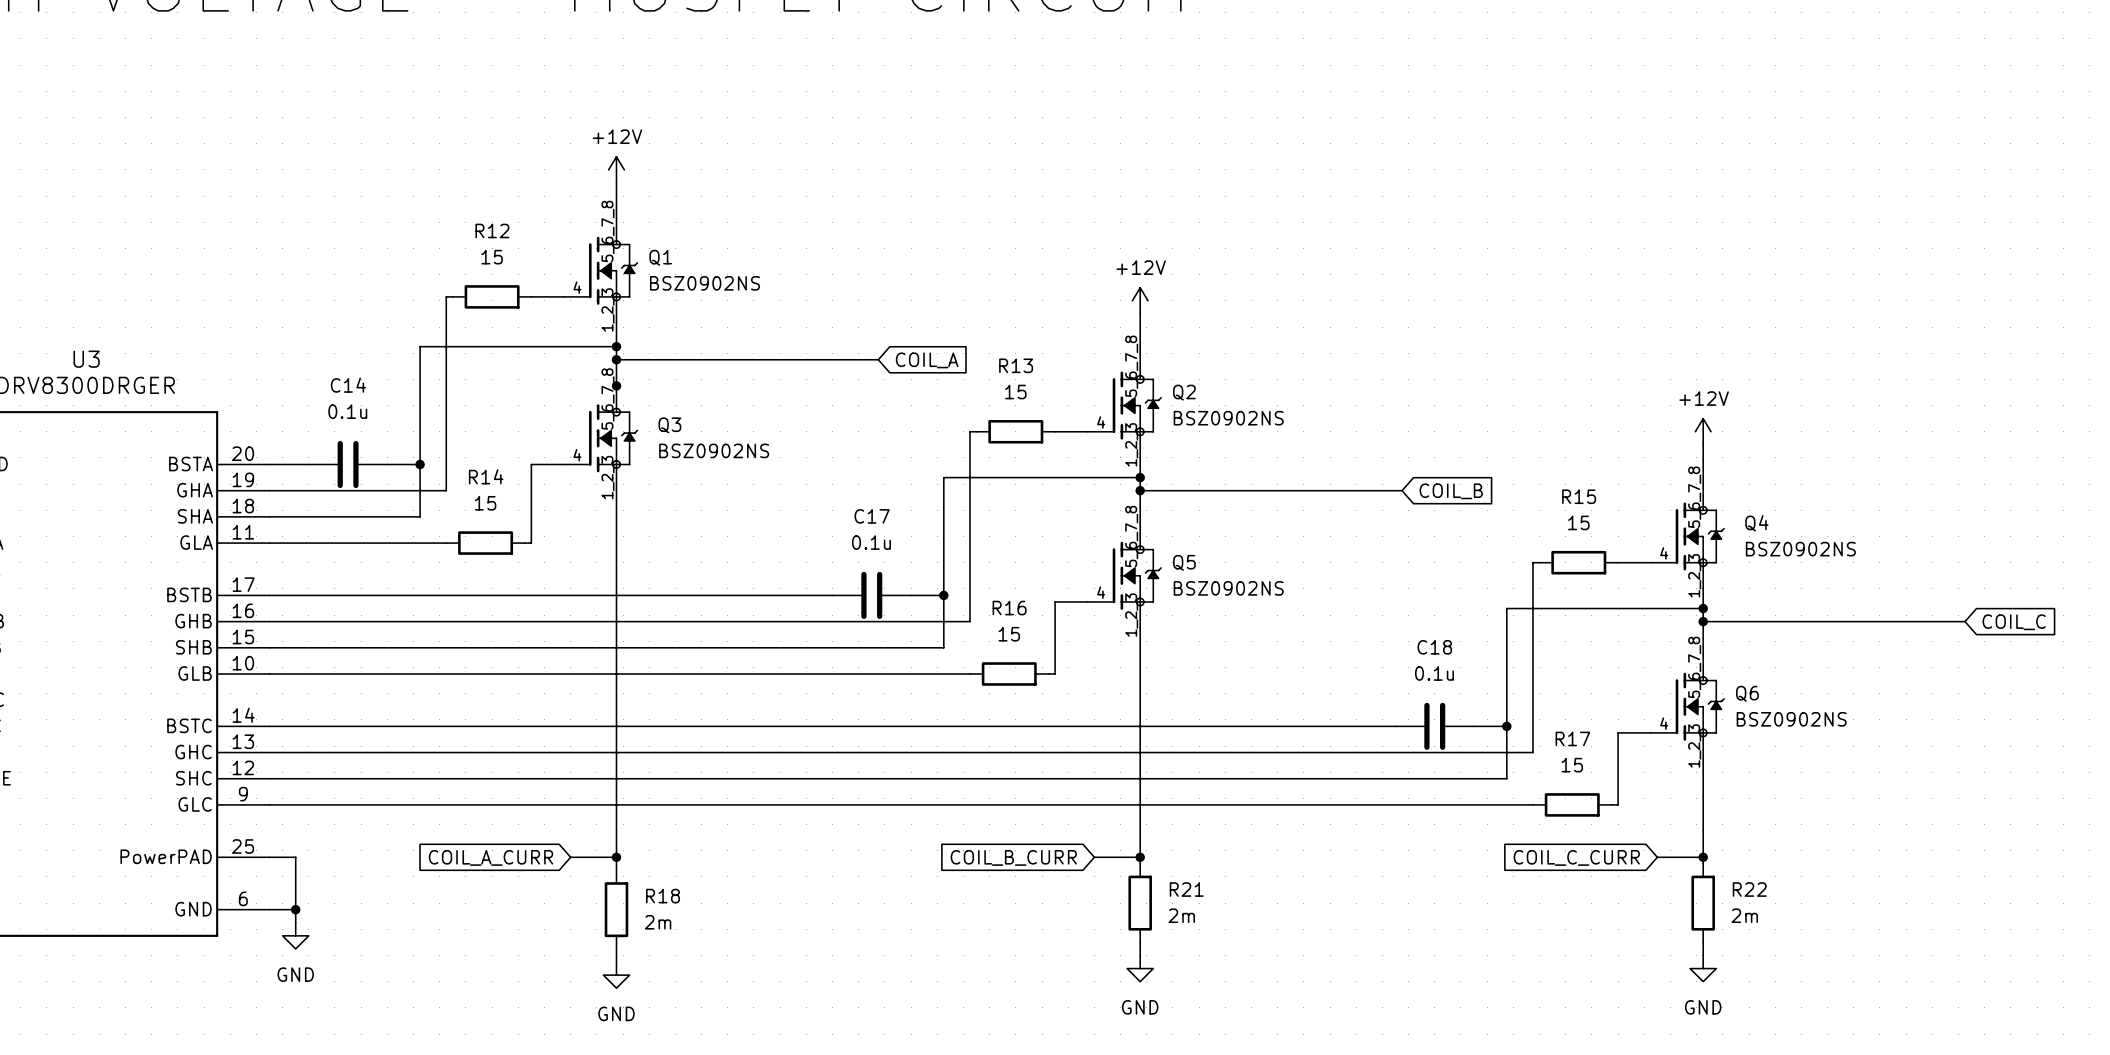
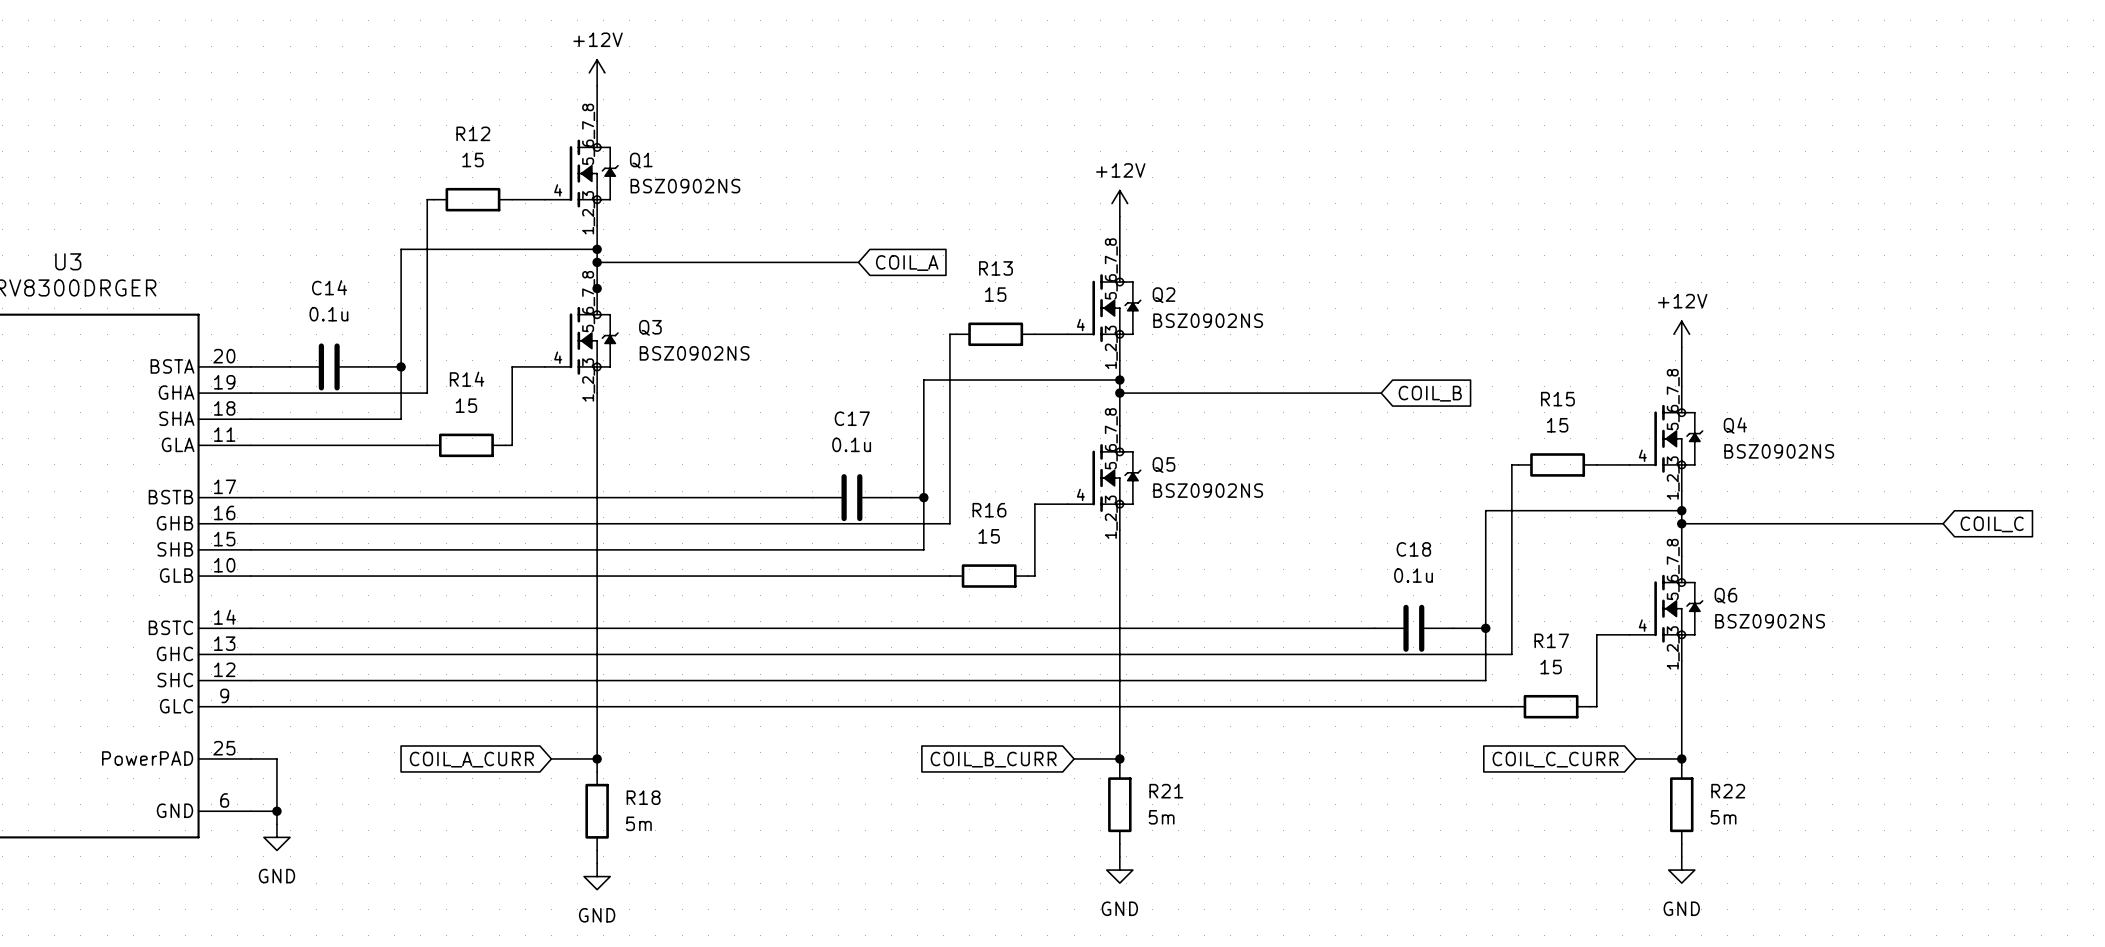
R21 value: 2m (1181, 915) -> 5m (1161, 817)
R22 value: 2m (1744, 915) -> 5m (1723, 817)
R18 value: 2m (658, 922) -> 5m (638, 823)

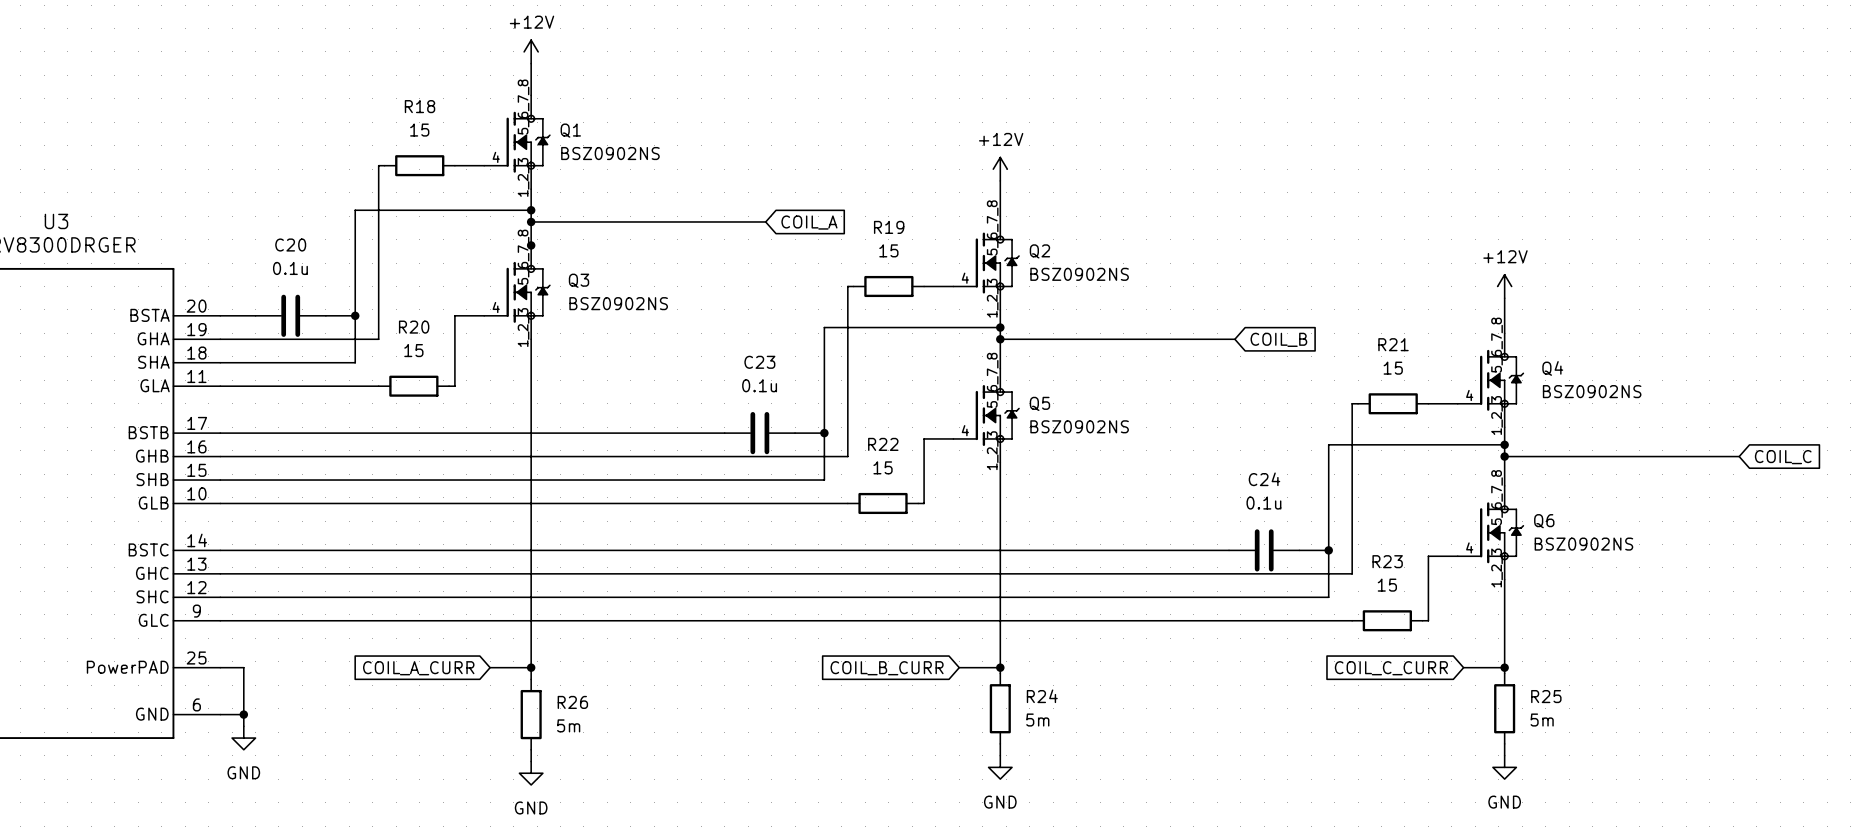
R12 name: R12 (473, 133) -> R18 (420, 106)
R13 name: R13 (996, 268) -> R19 (889, 227)
C14 name: C14 (329, 287) -> C20 (290, 245)
R14 name: R14 (467, 379) -> R20 (414, 327)
R15 name: R15 (1557, 399) -> R21 (1393, 344)
C17 name: C17 (852, 418) -> C23 (759, 362)
R16 name: R16 (989, 510) -> R22 (883, 444)
C18 name: C18 (1413, 549) -> C24 (1264, 479)
R17 name: R17 (1551, 640) -> R23 (1387, 561)
R21 name: R21 (1166, 791) -> R24 (1042, 696)
R22 name: R22 (1728, 791) -> R25 (1546, 696)
R18 name: R18 (643, 797) -> R26 (572, 702)

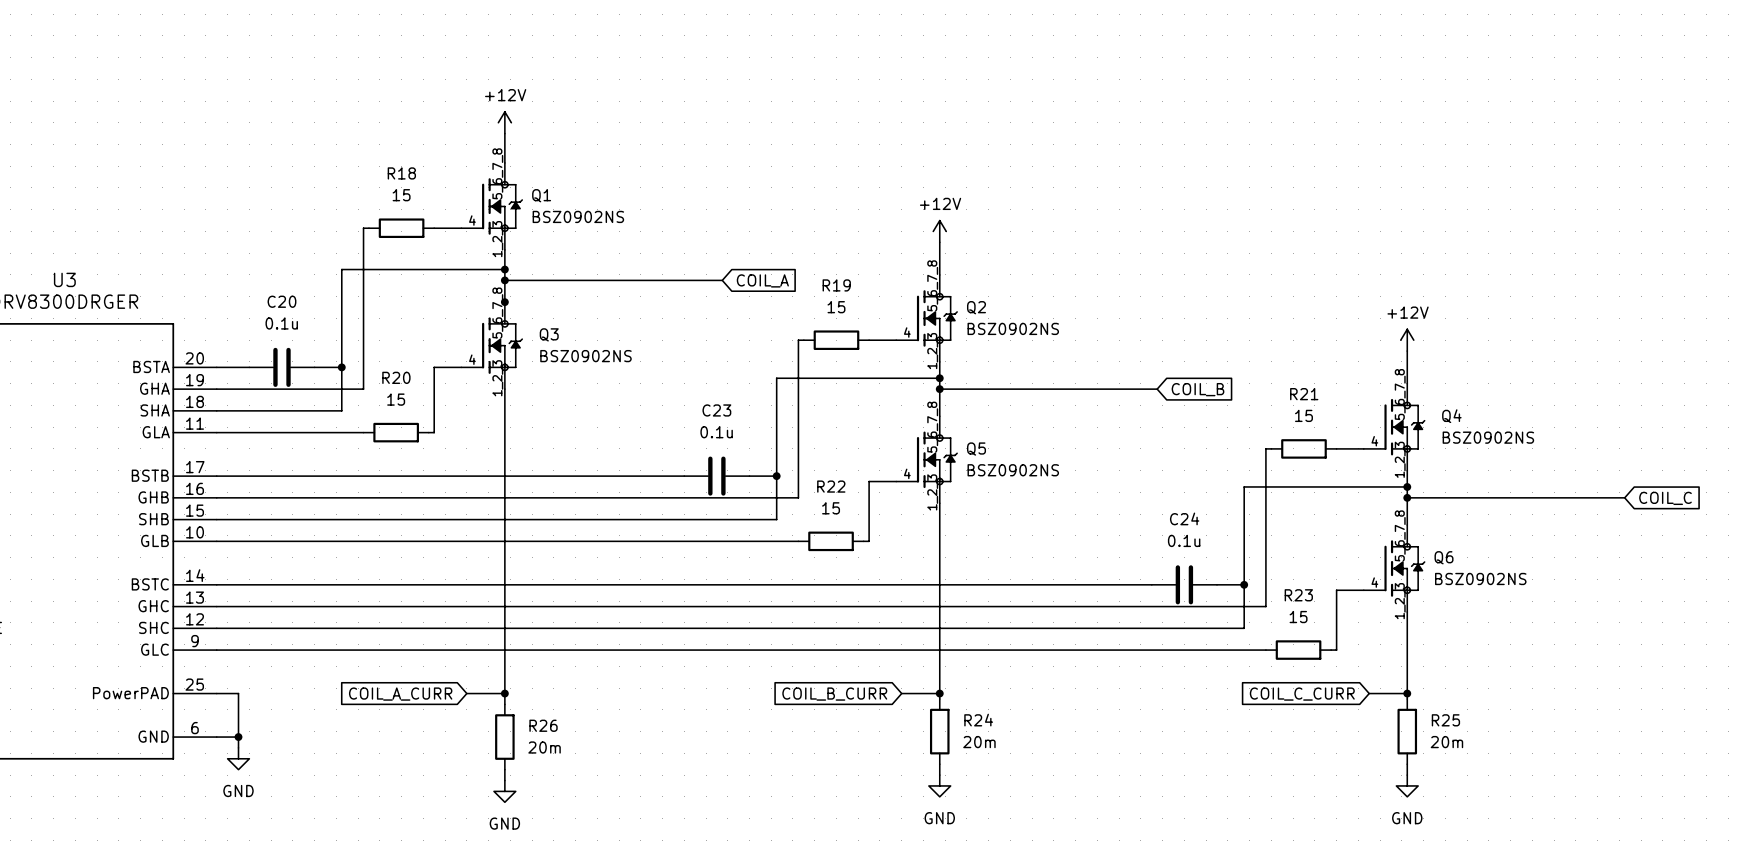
R24 value: 5m (1037, 720) -> 20m (979, 742)
R25 value: 5m (1542, 720) -> 20m (1446, 742)
R26 value: 5m (568, 725) -> 20m (544, 747)

